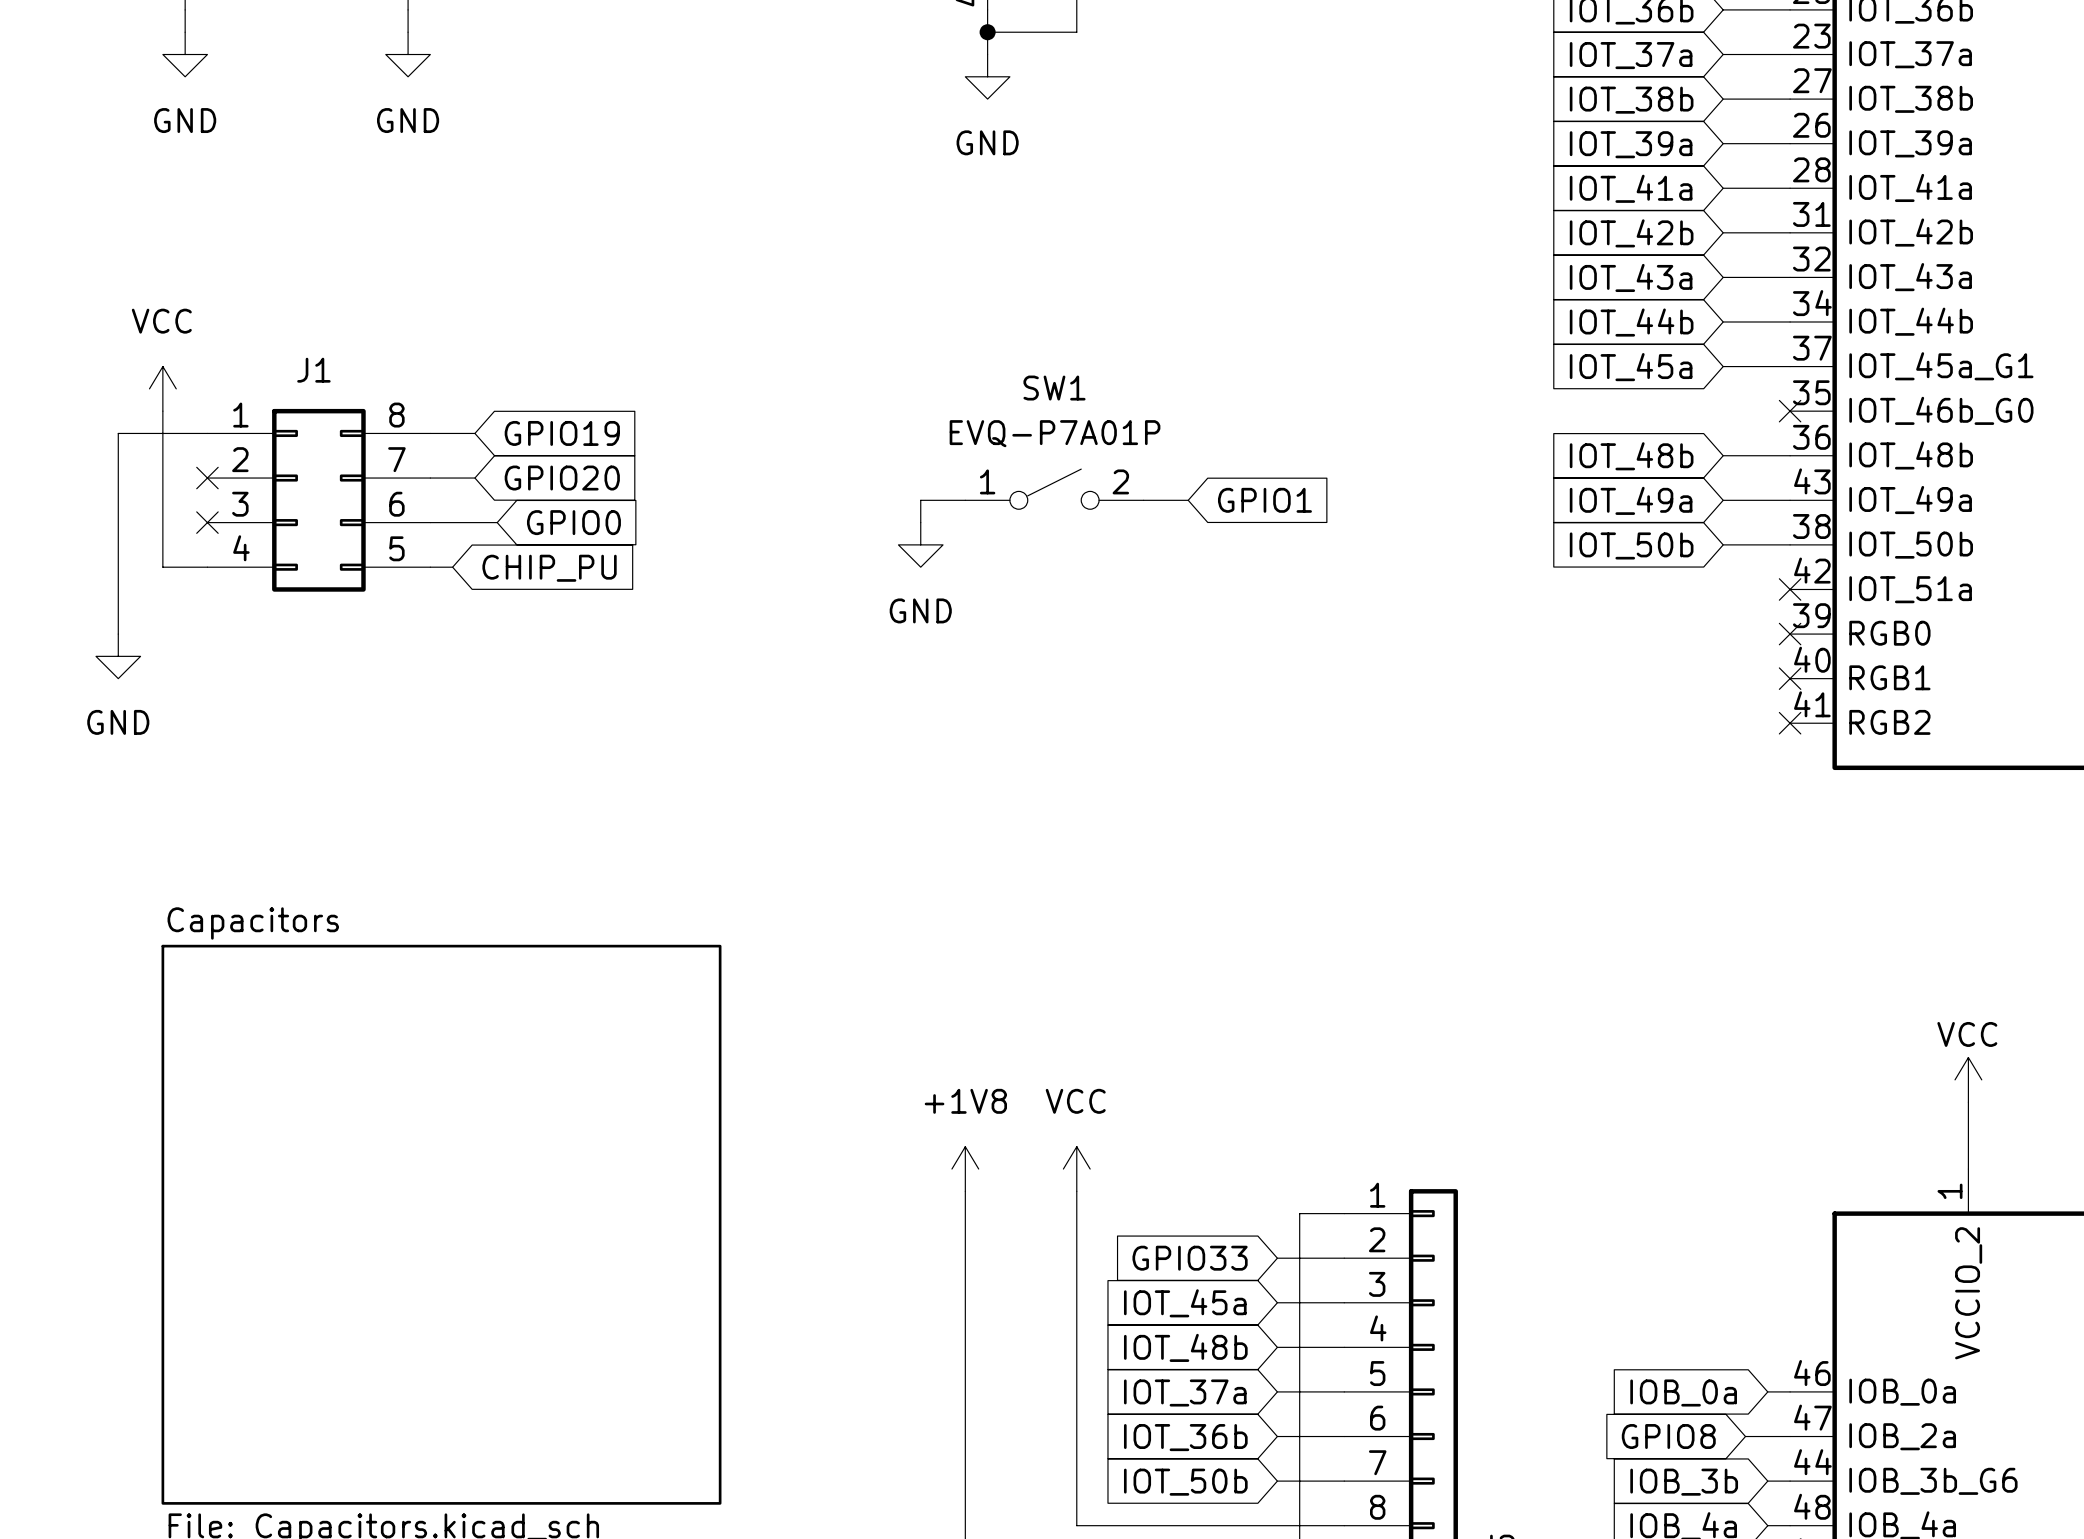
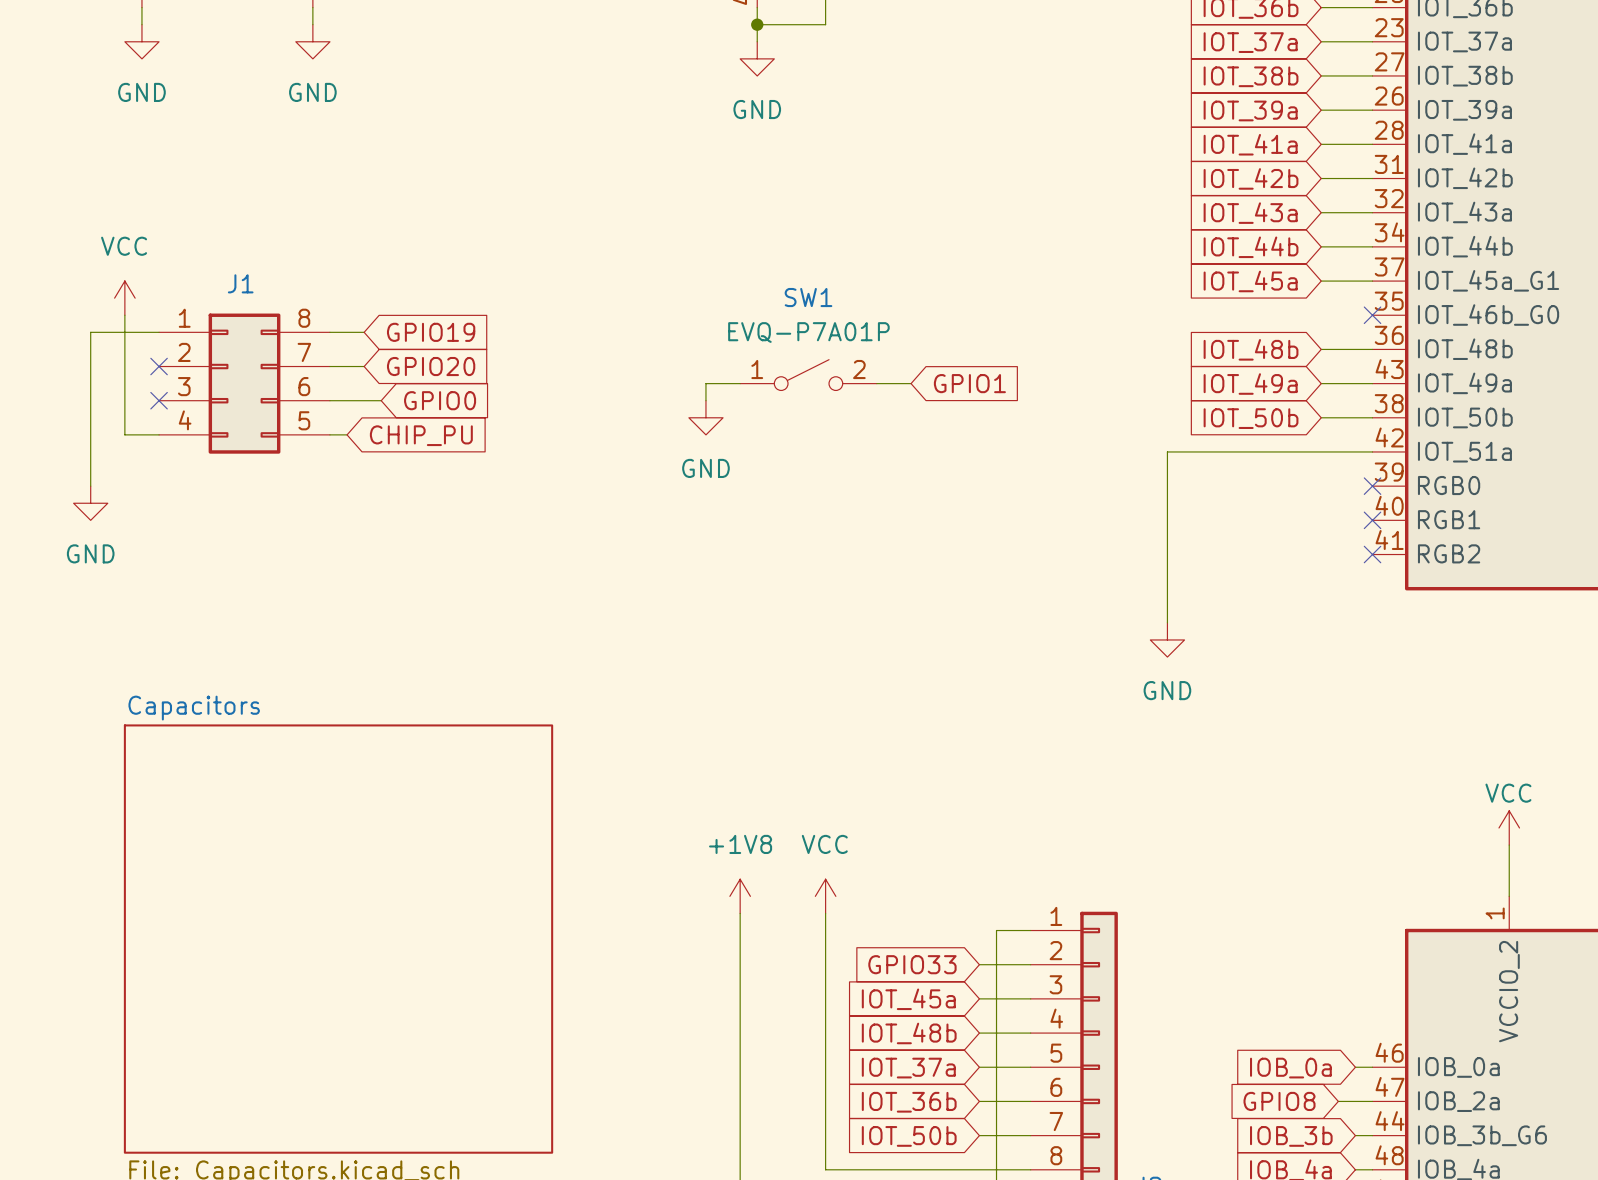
wire: none -> (1372, 451) (1167, 451) (1167, 622)
no-connect mark: (1790, 589) -> none
power symbol: none -> GND (1167, 639)

